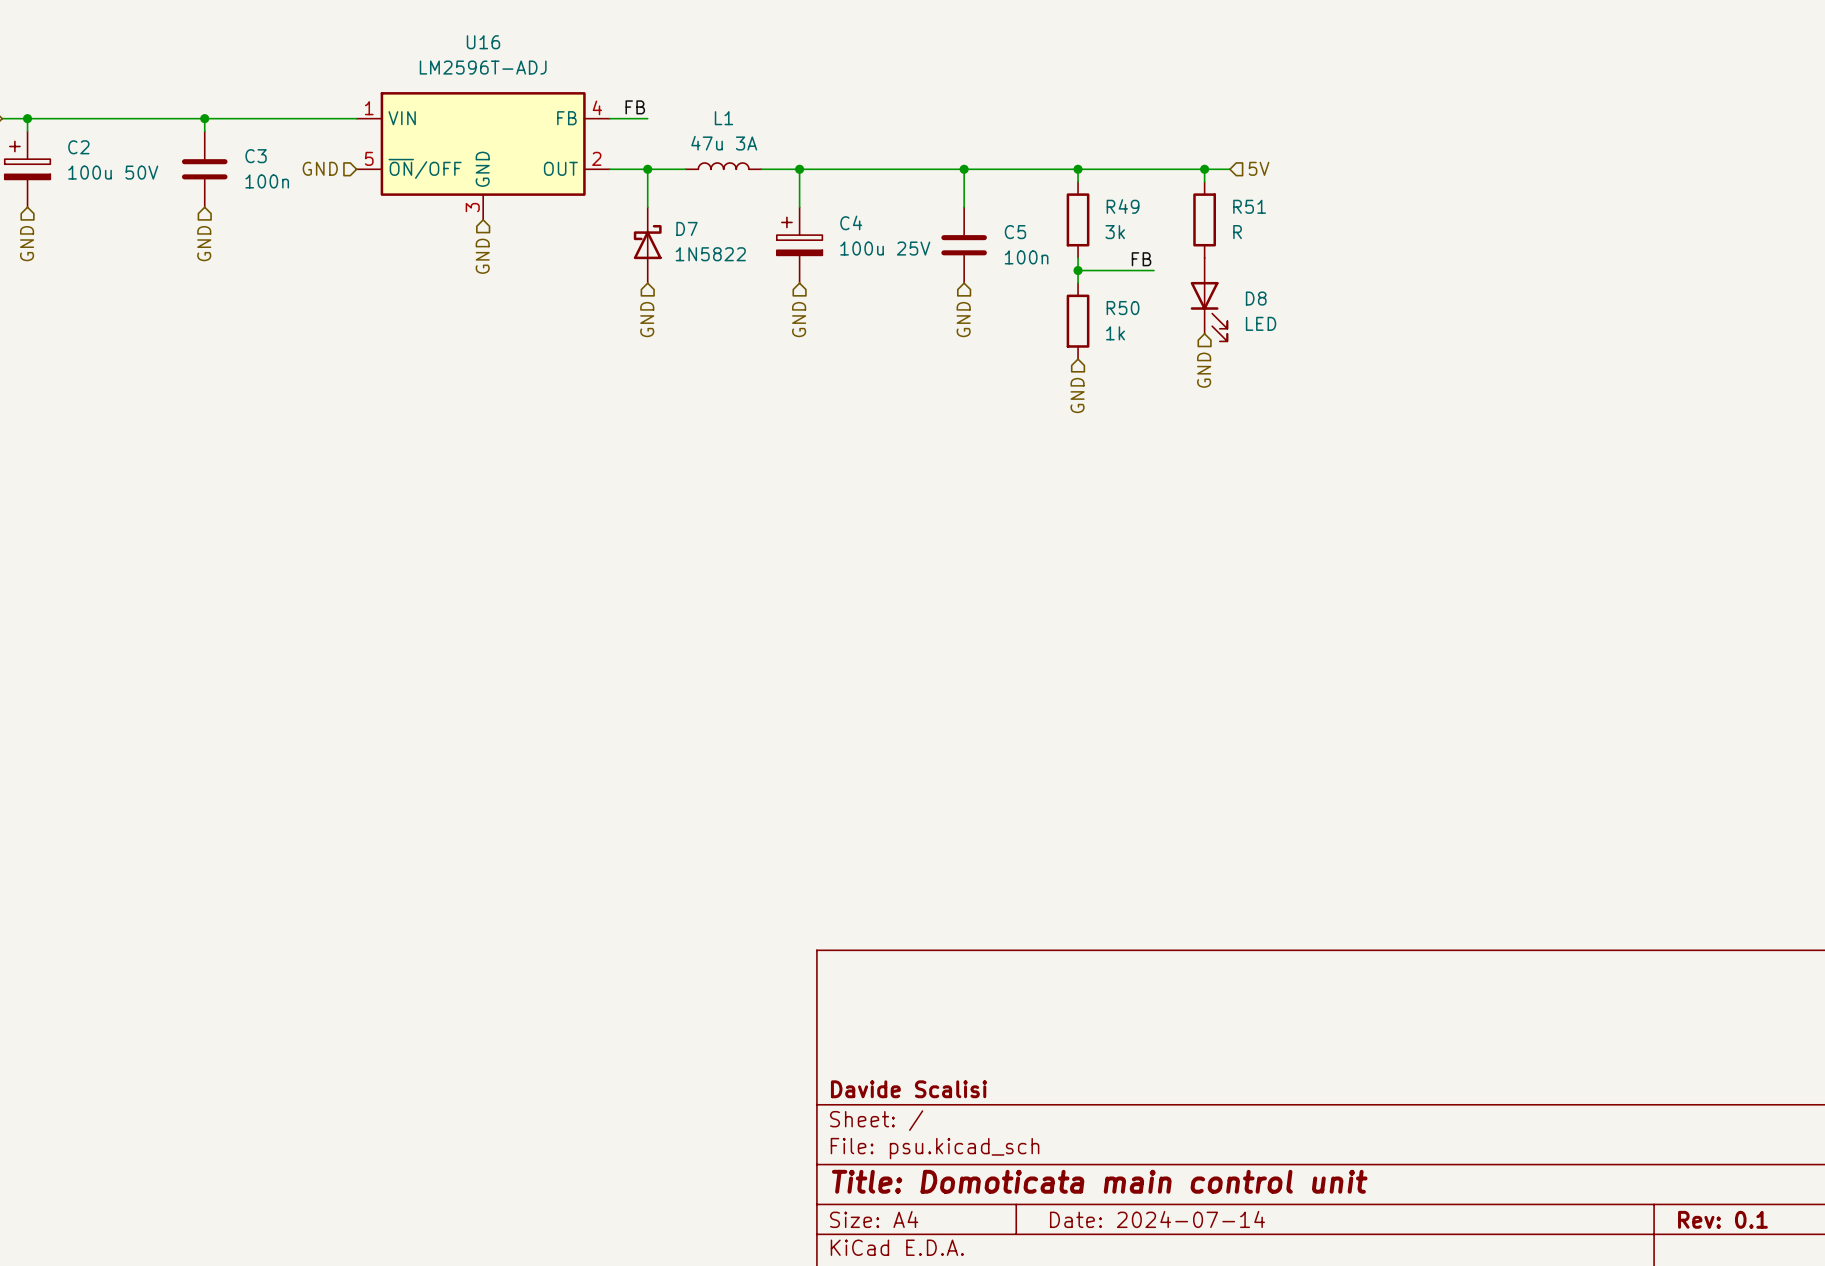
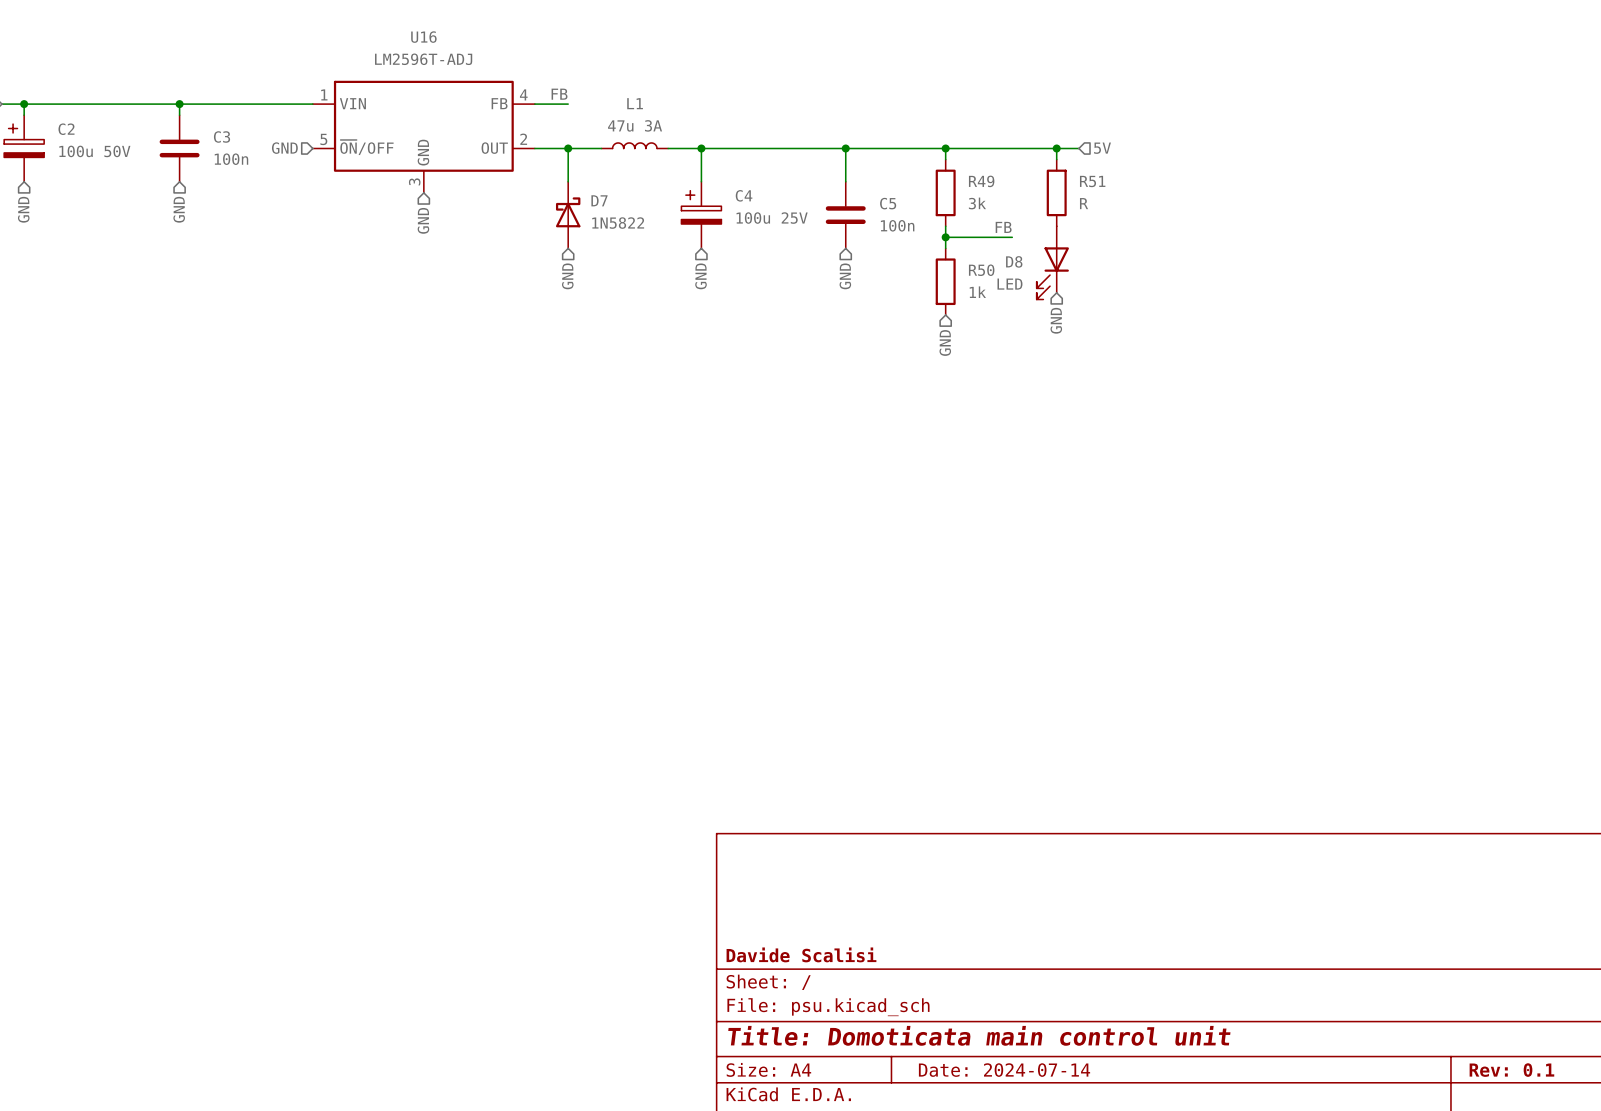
D8 flip: as is (1209, 311) -> left-right (1052, 273)

